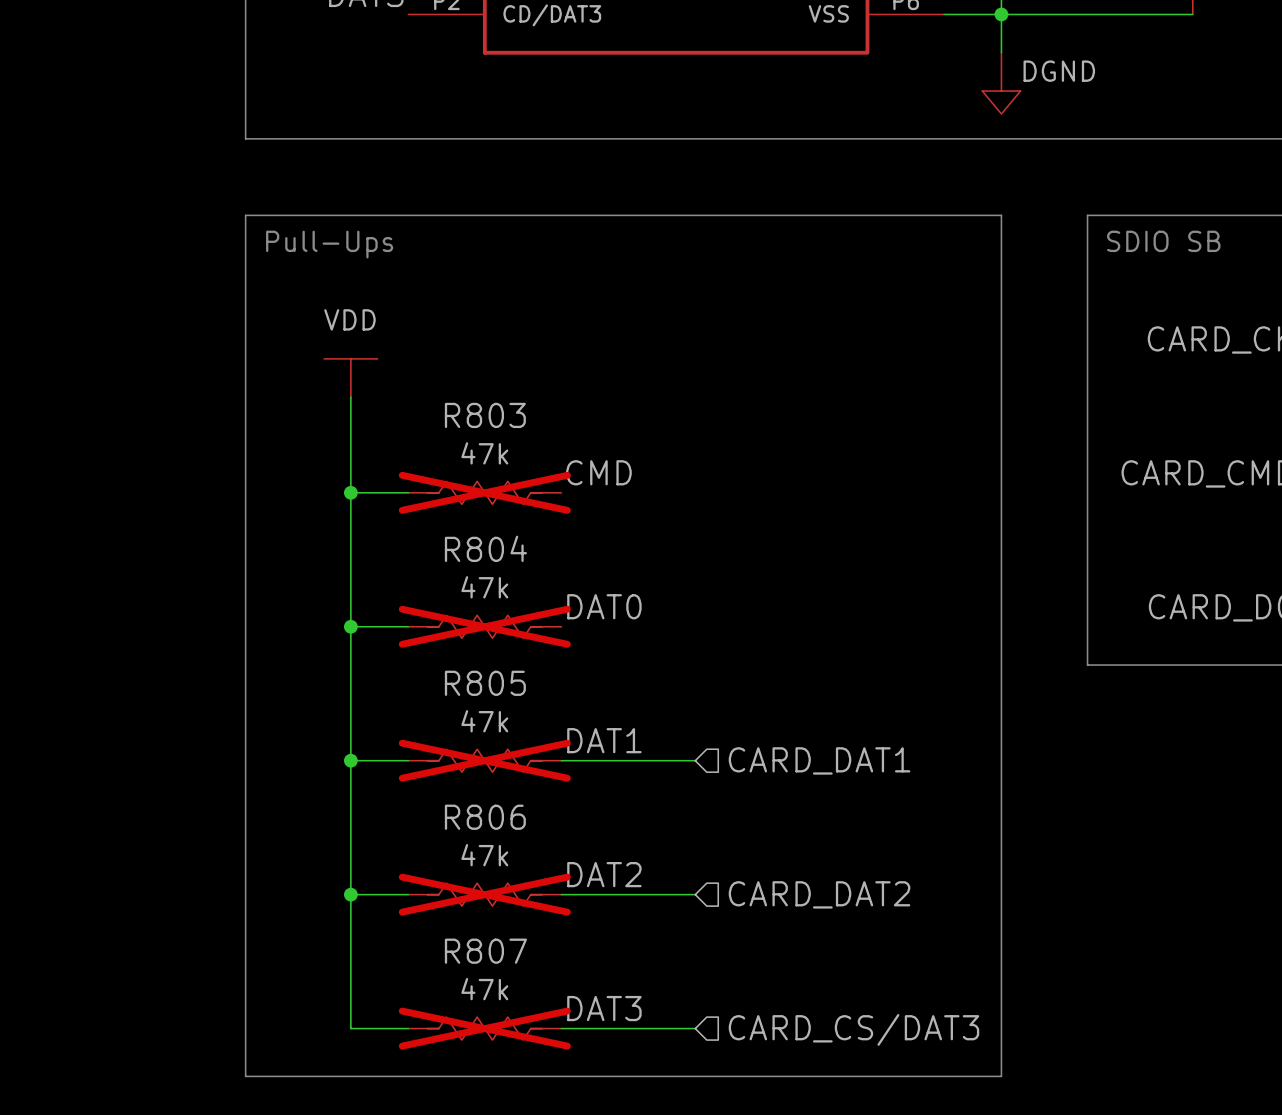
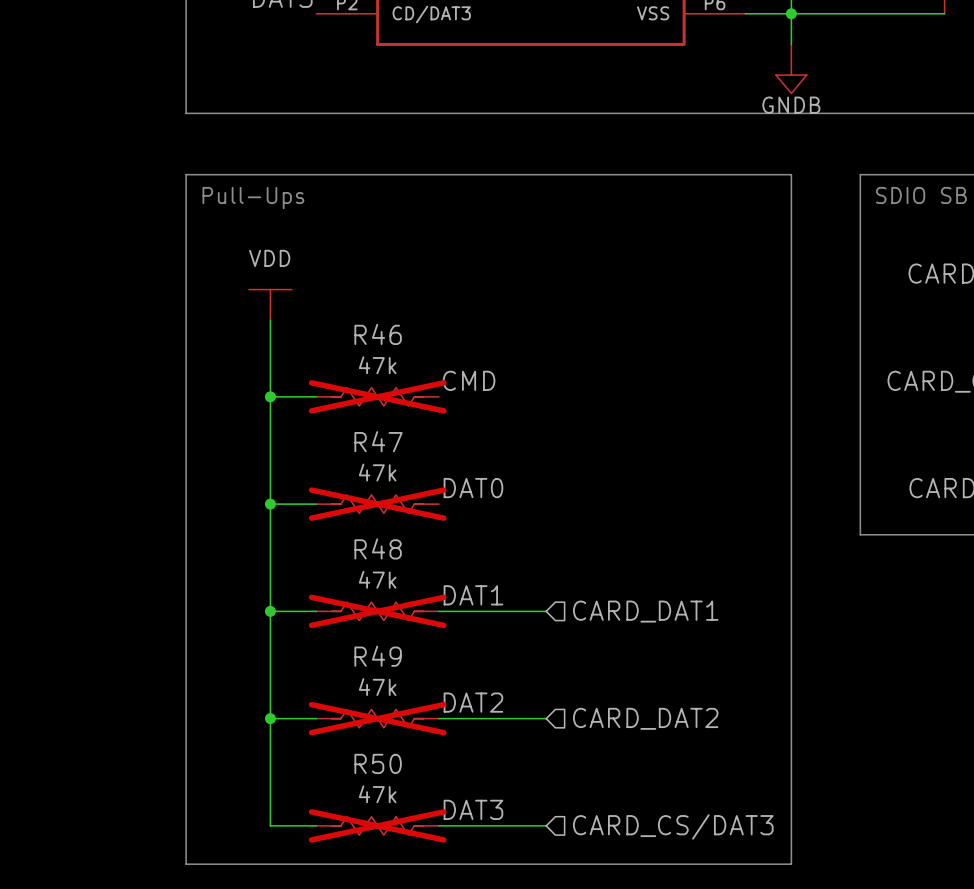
power symbol: DGND (1001, 83) -> GNDB (791, 68)
R803 name: R803 (485, 415) -> R46 (378, 334)
R804 name: R804 (485, 548) -> R47 (378, 441)
R805 name: R805 (485, 683) -> R48 (378, 548)
R806 name: R806 (485, 817) -> R49 (378, 656)
R807 name: R807 (485, 951) -> R50 (378, 763)

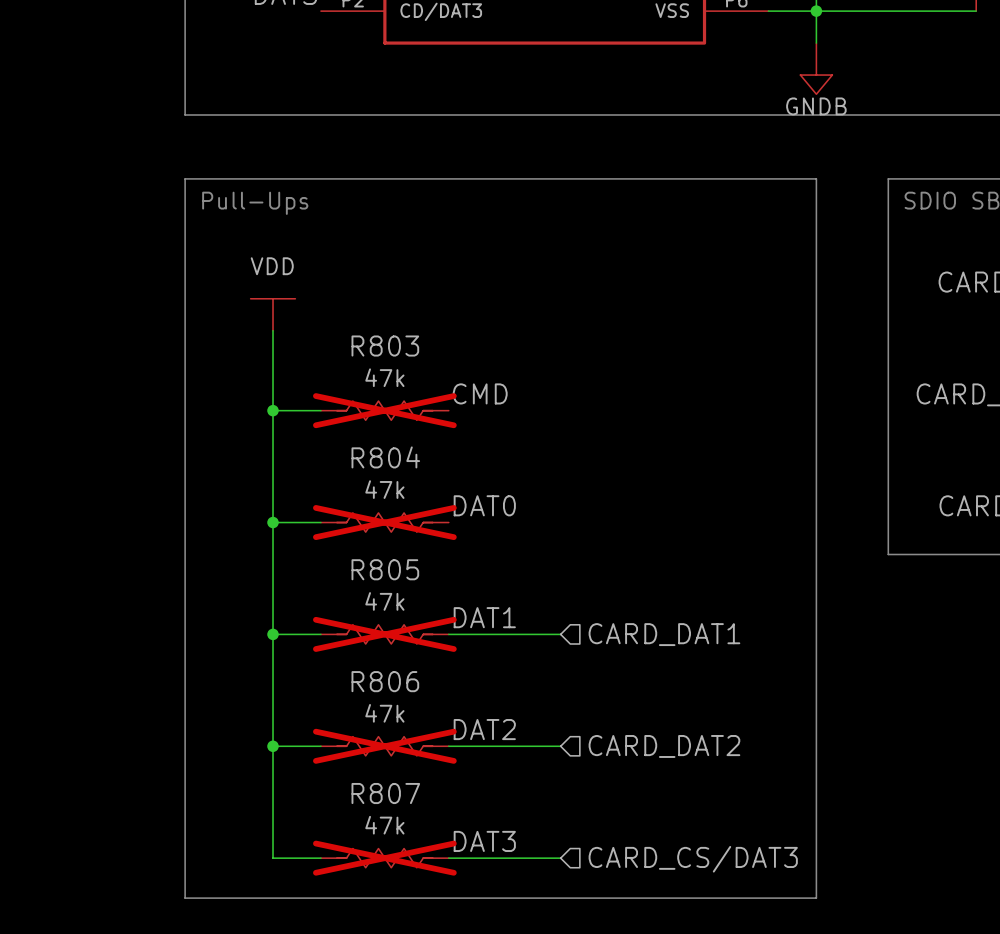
R46 name: R46 (378, 334) -> R803 (385, 346)
R47 name: R47 (378, 441) -> R804 (385, 457)
R48 name: R48 (378, 548) -> R805 (385, 569)
R49 name: R49 (378, 656) -> R806 (385, 681)
R50 name: R50 (378, 763) -> R807 (385, 793)

